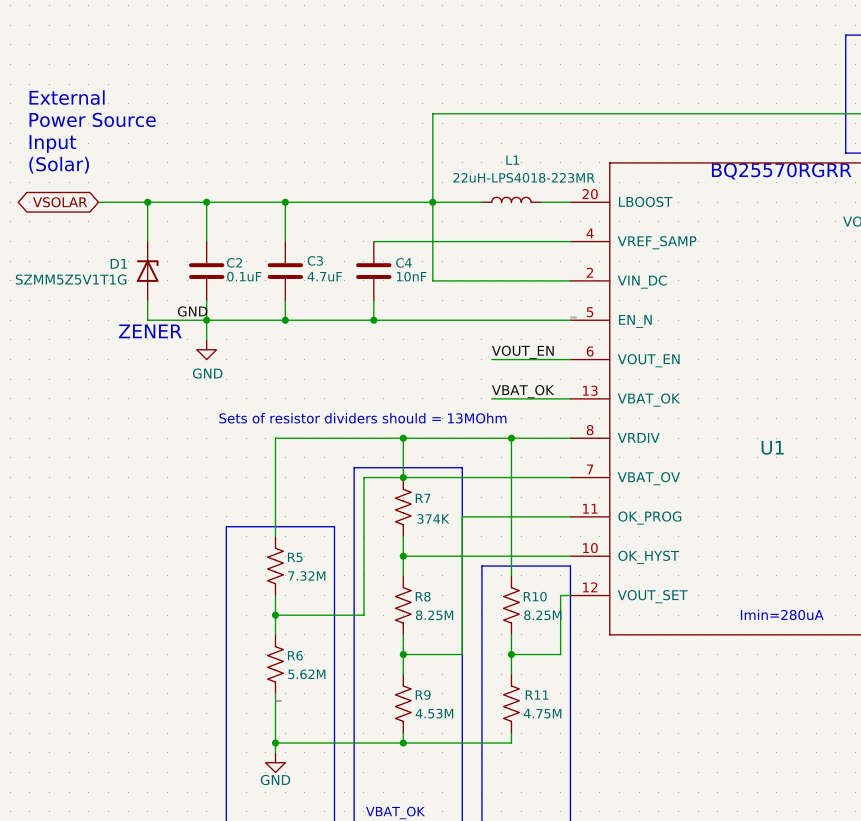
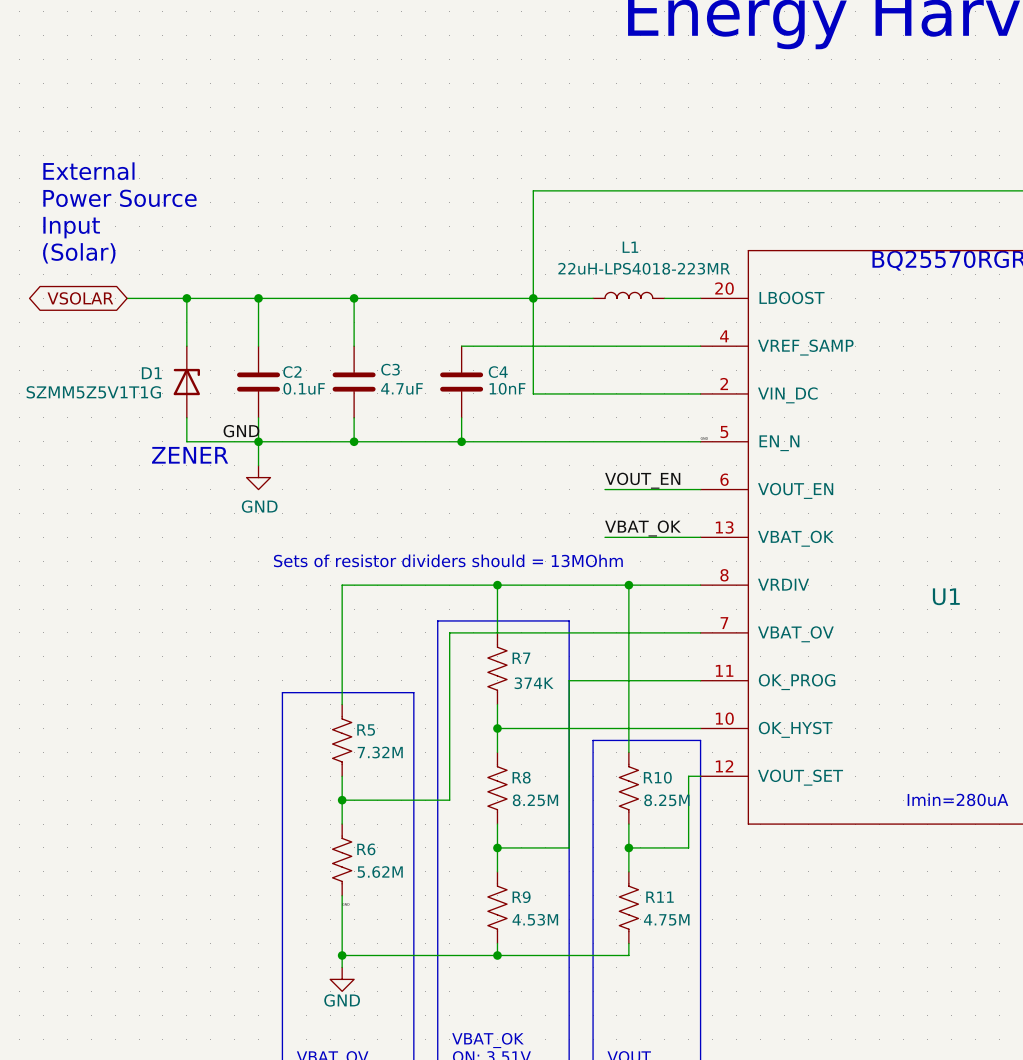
junction: (403, 477) -> none

